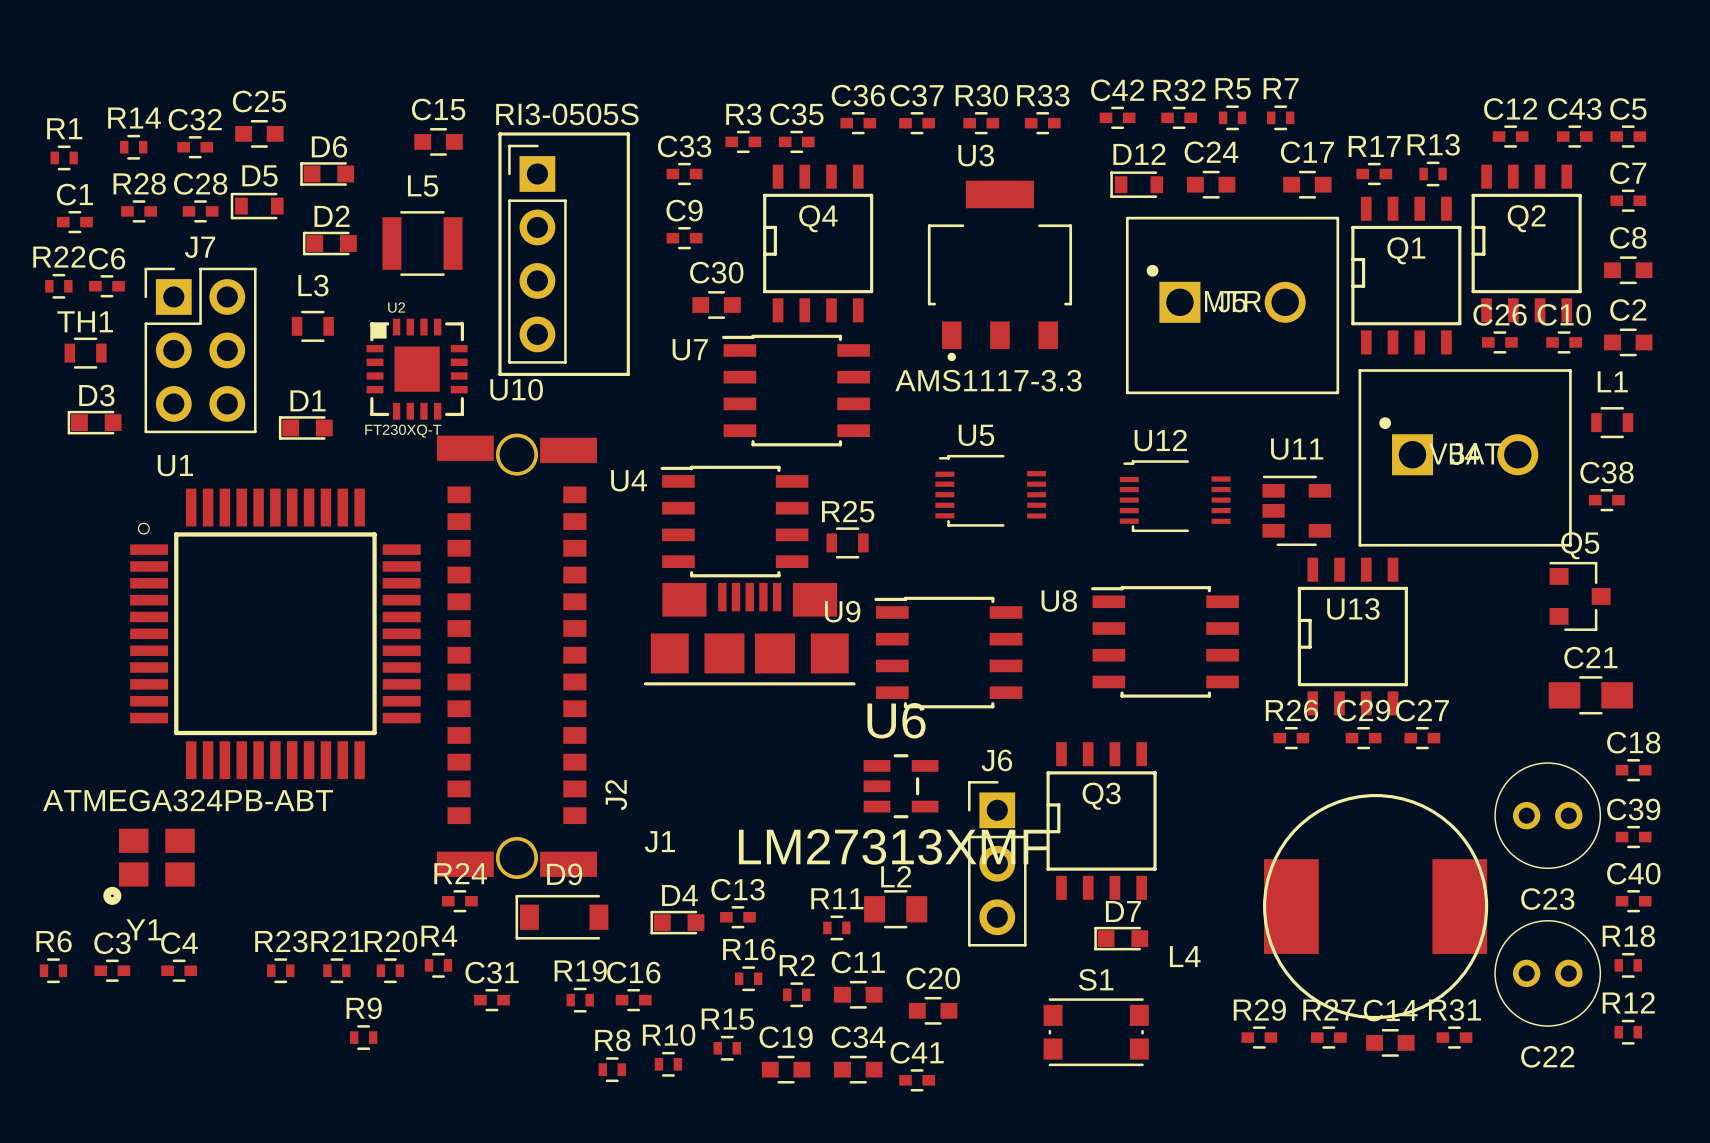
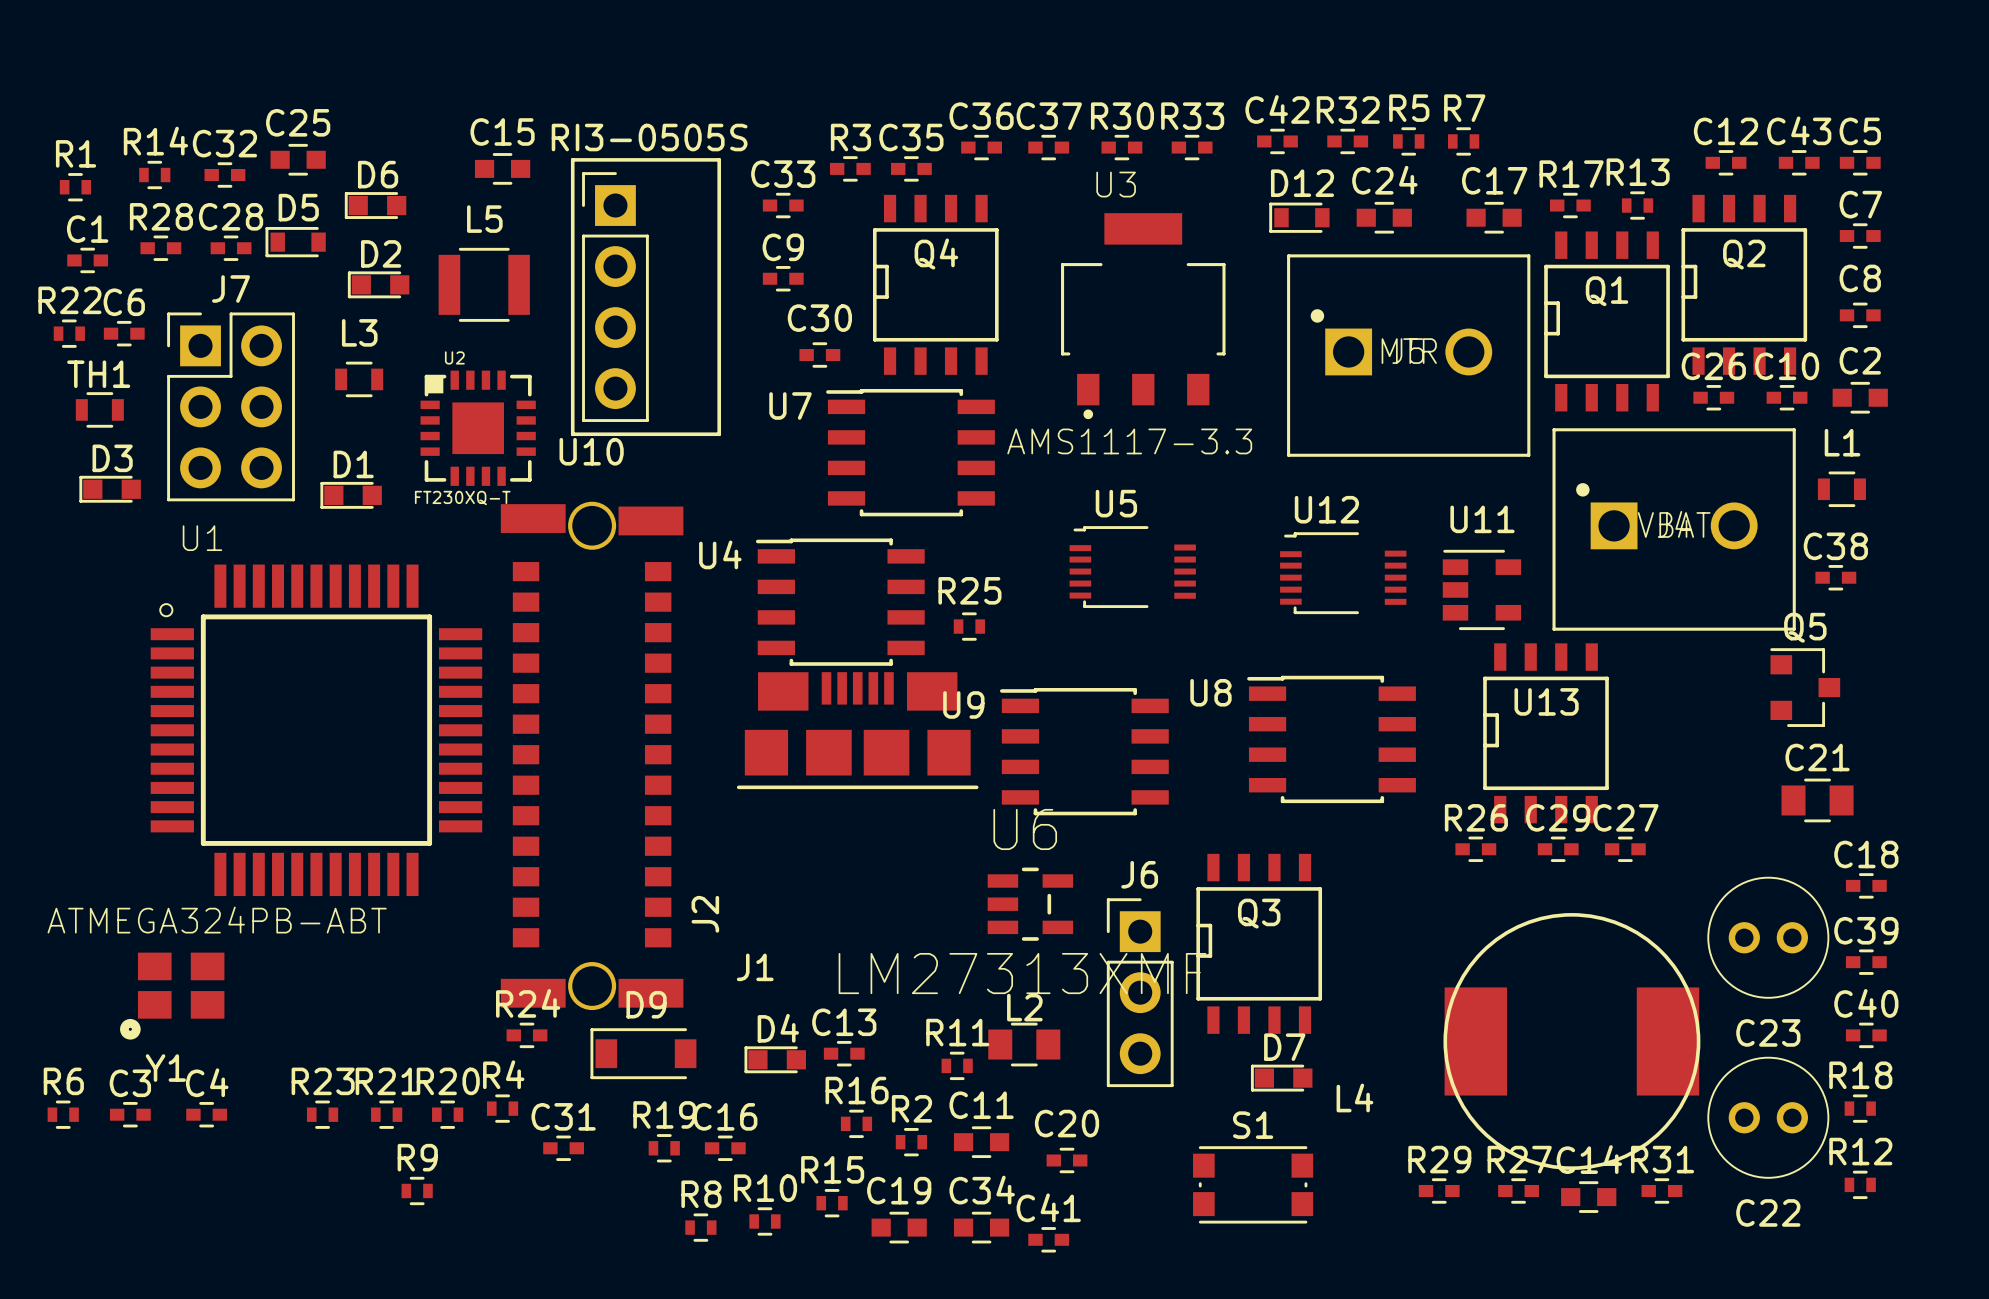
C8 footprint: [1604, 256, 1653, 285] -> [1839, 302, 1881, 329]
C30 footprint: [692, 291, 741, 319] -> [799, 342, 841, 368]
R25 footprint: [826, 527, 869, 559] -> [953, 612, 985, 641]
C21 footprint: [1548, 676, 1633, 715] -> [1781, 778, 1854, 823]
C20 footprint: [908, 996, 958, 1025] -> [1046, 1147, 1088, 1174]

